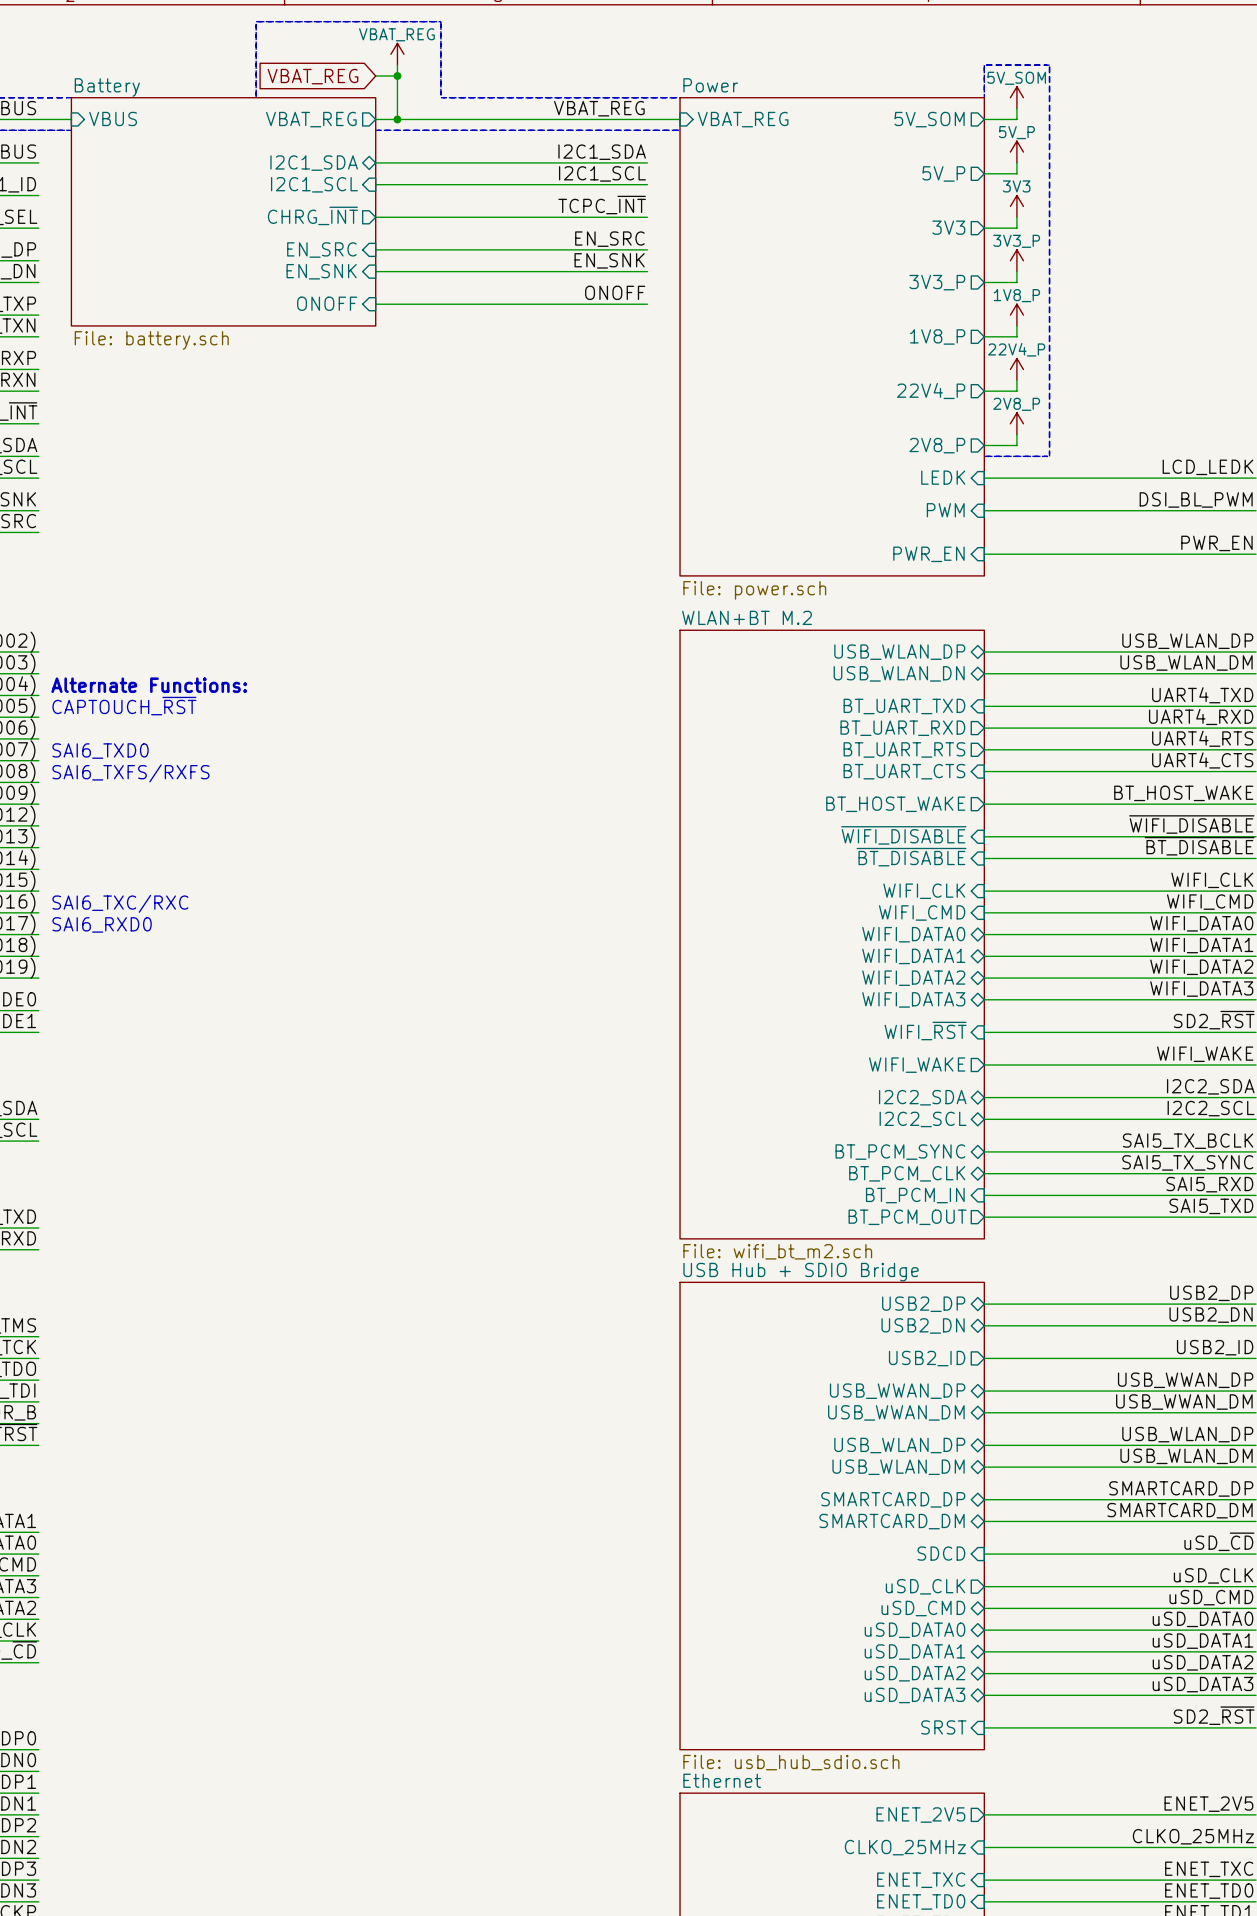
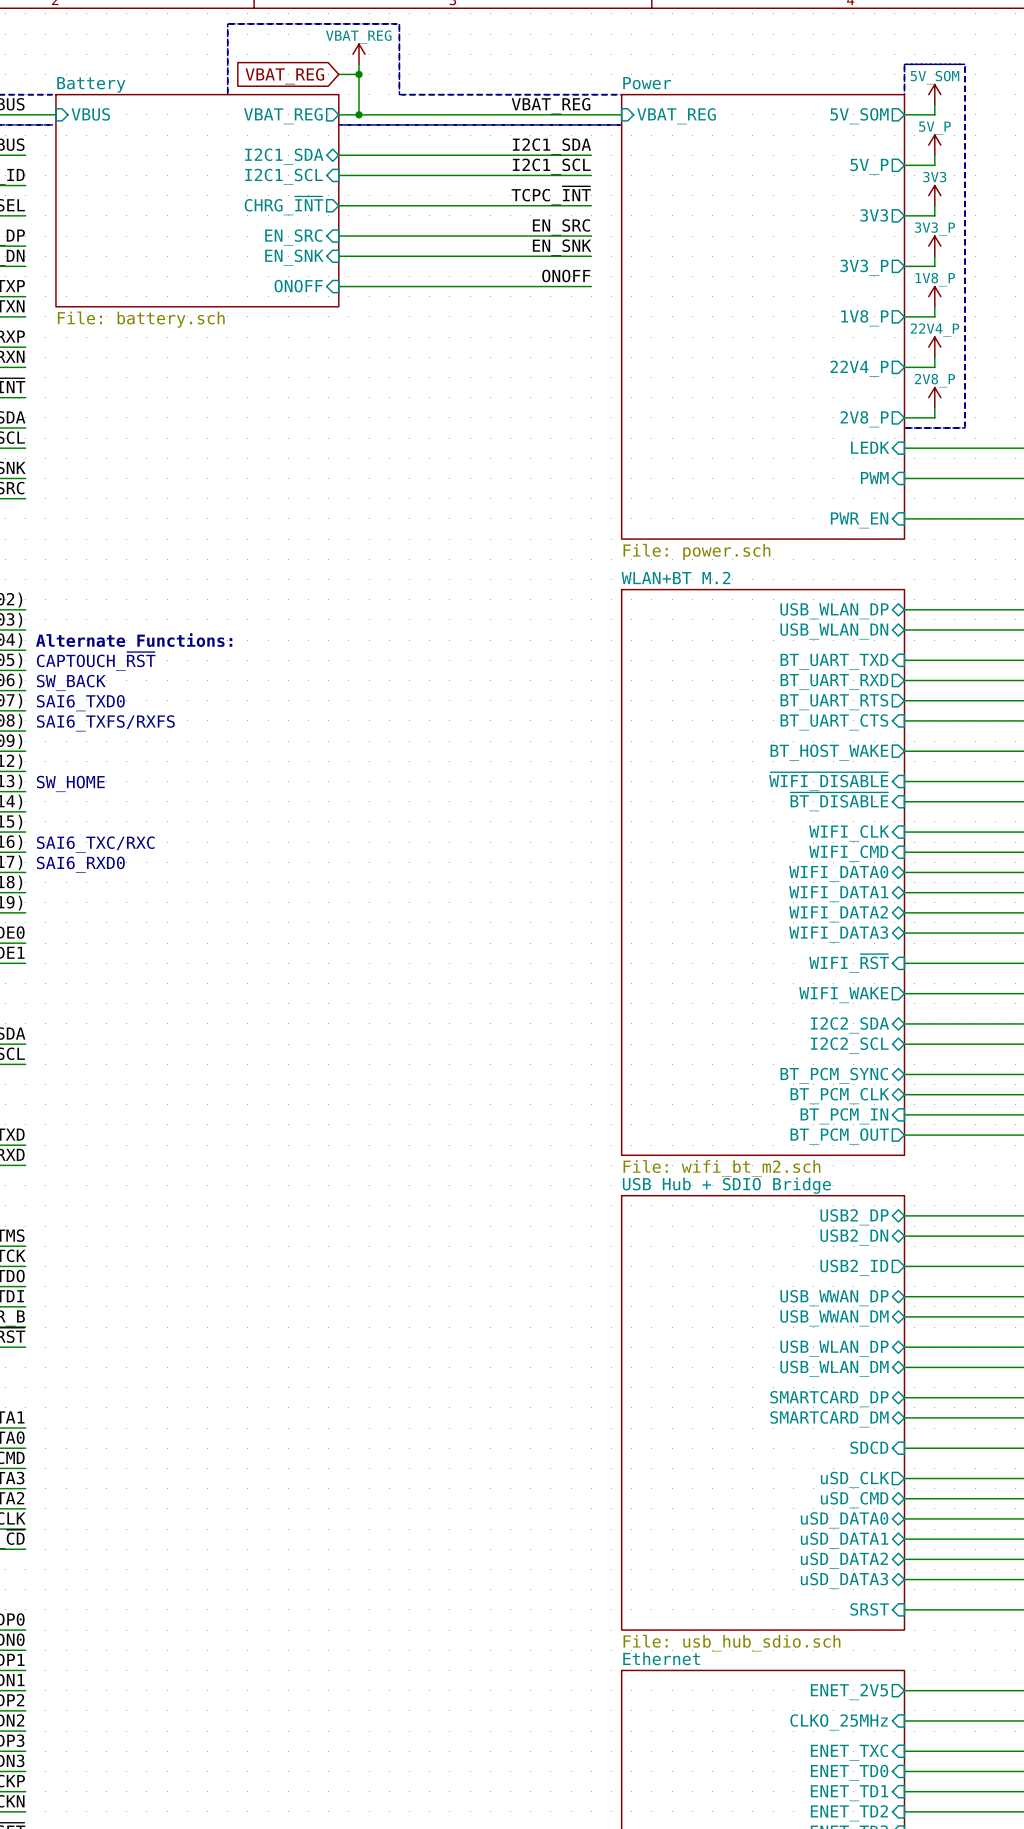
text: none -> SW_BACK (71, 682)
text: none -> SW_HOME (70, 783)

